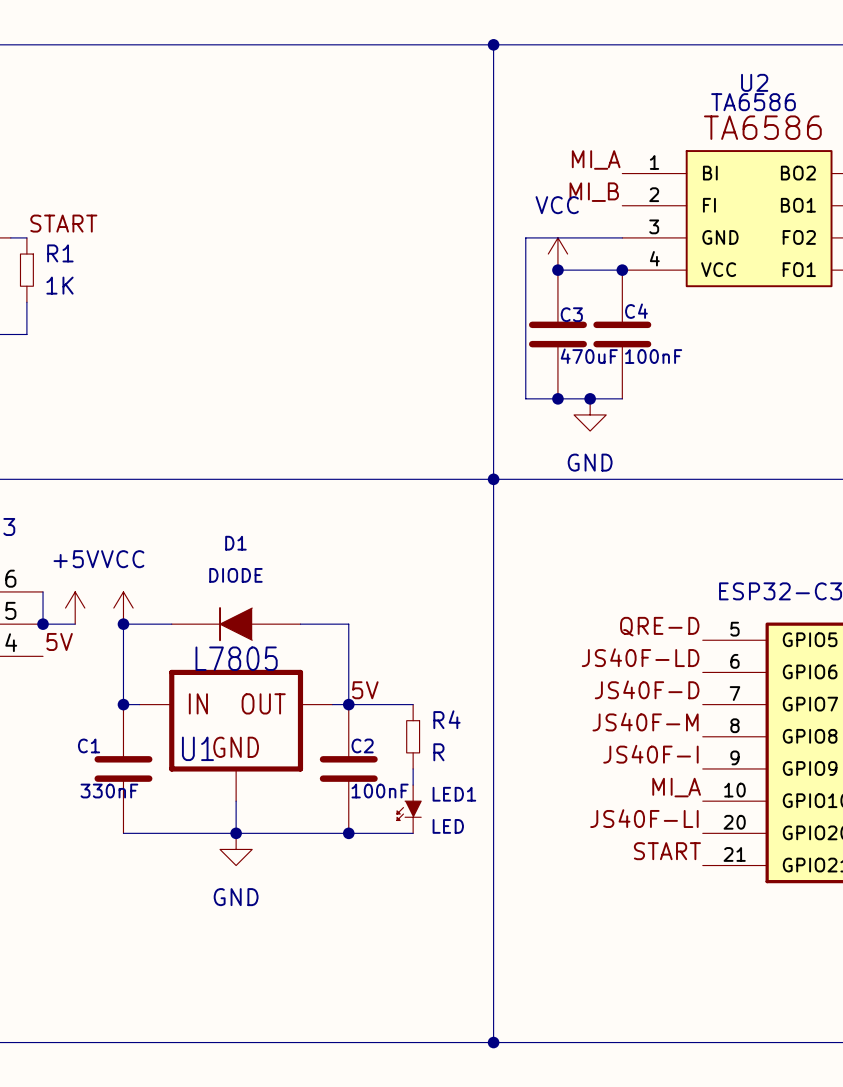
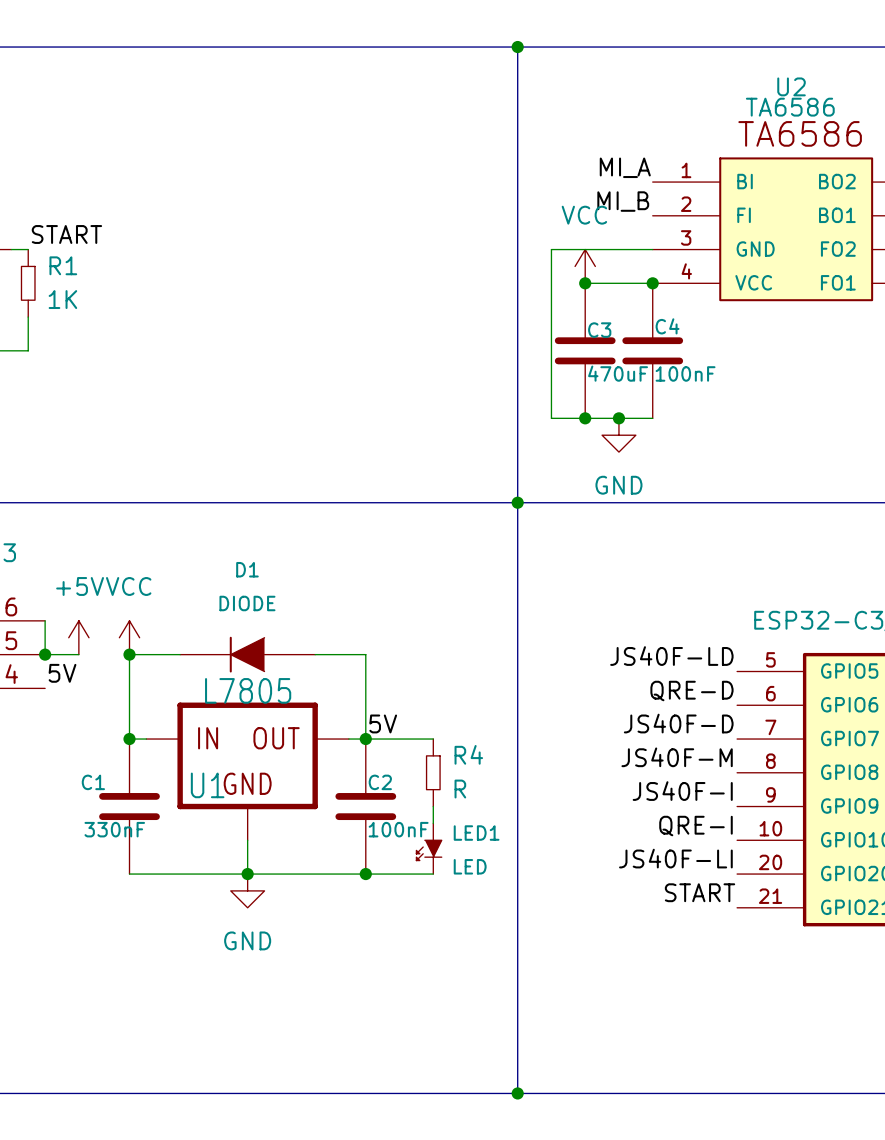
label: QRE-D (659, 626) -> JS40F-LD (671, 656)
label: JS40F-LD (640, 657) -> QRE-D (691, 691)
label: MI_A (676, 787) -> QRE-I (695, 826)

